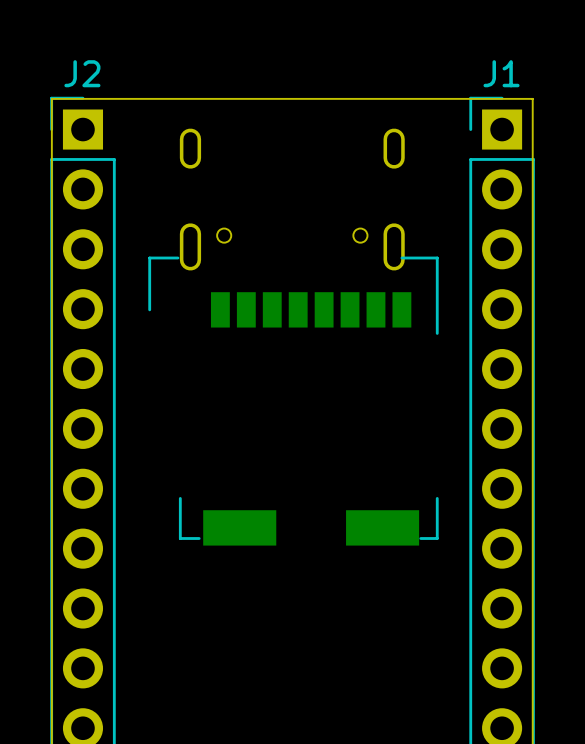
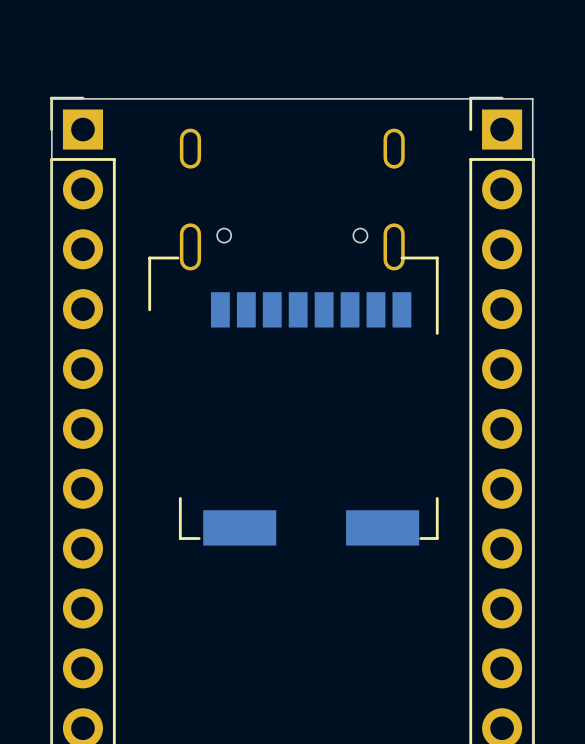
J2 name: J2 (82, 73) -> none
J1 name: J1 (501, 73) -> none

